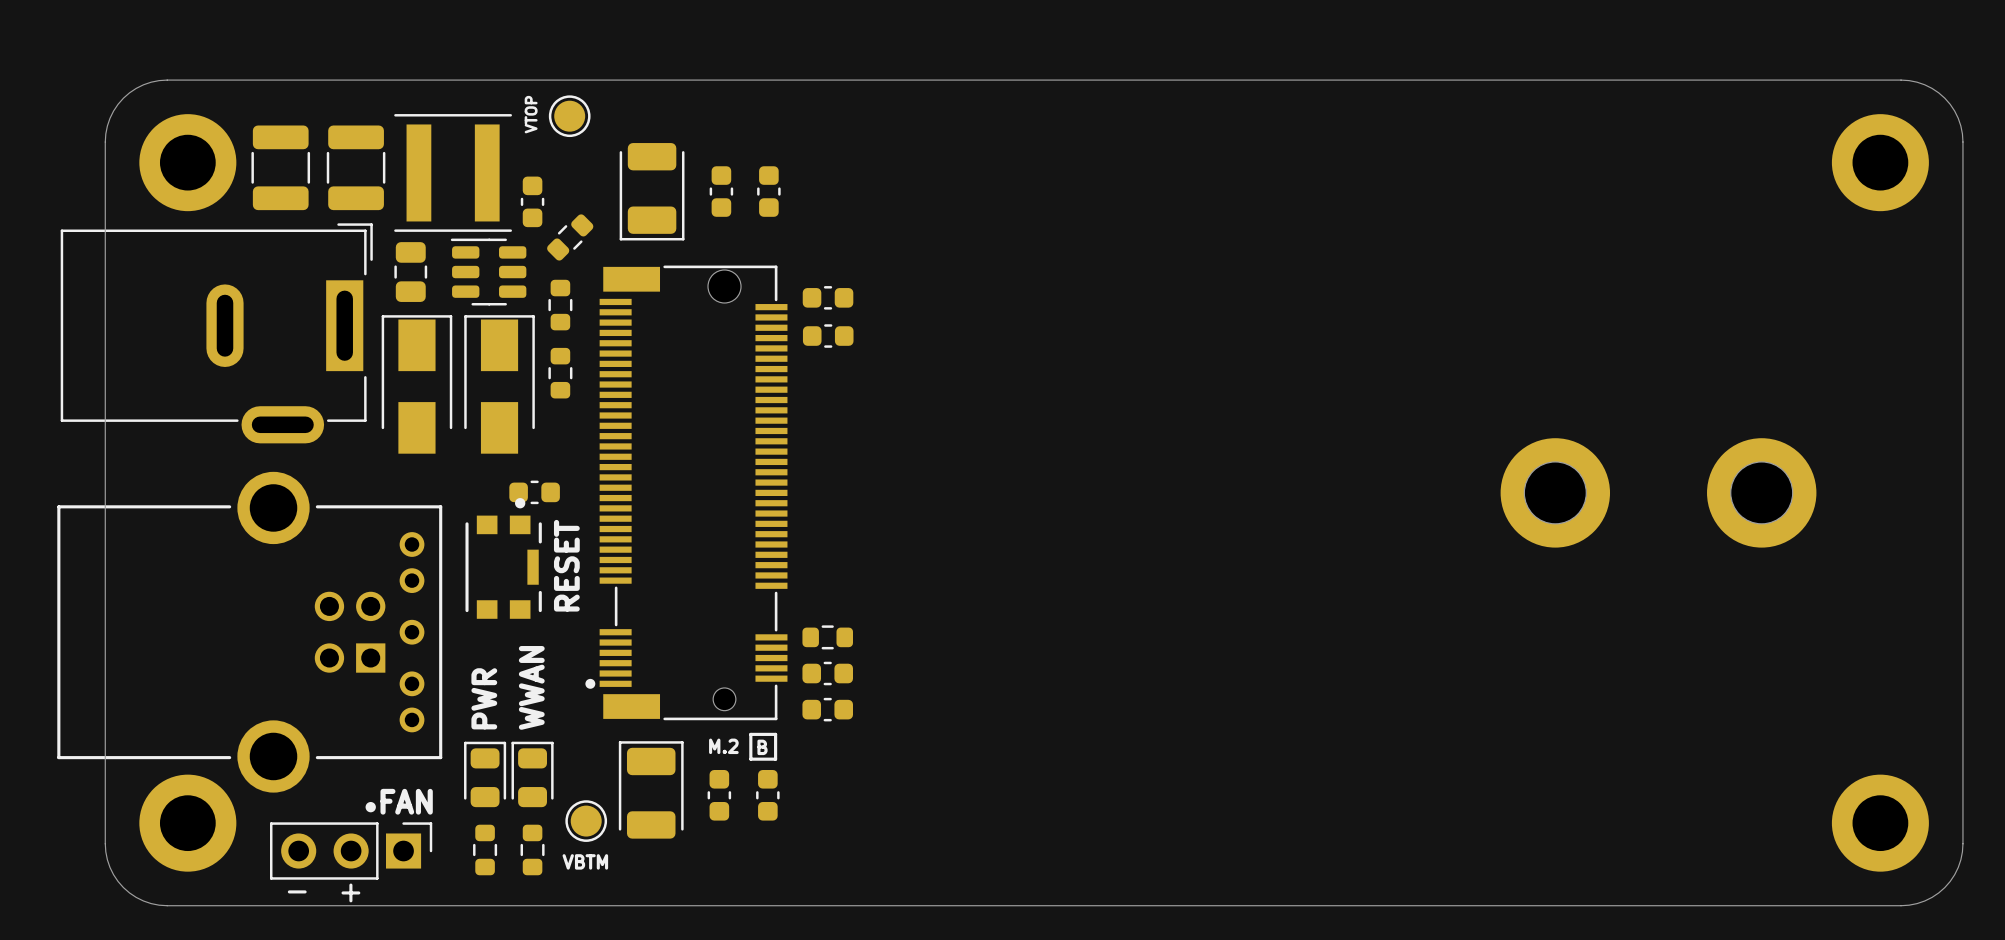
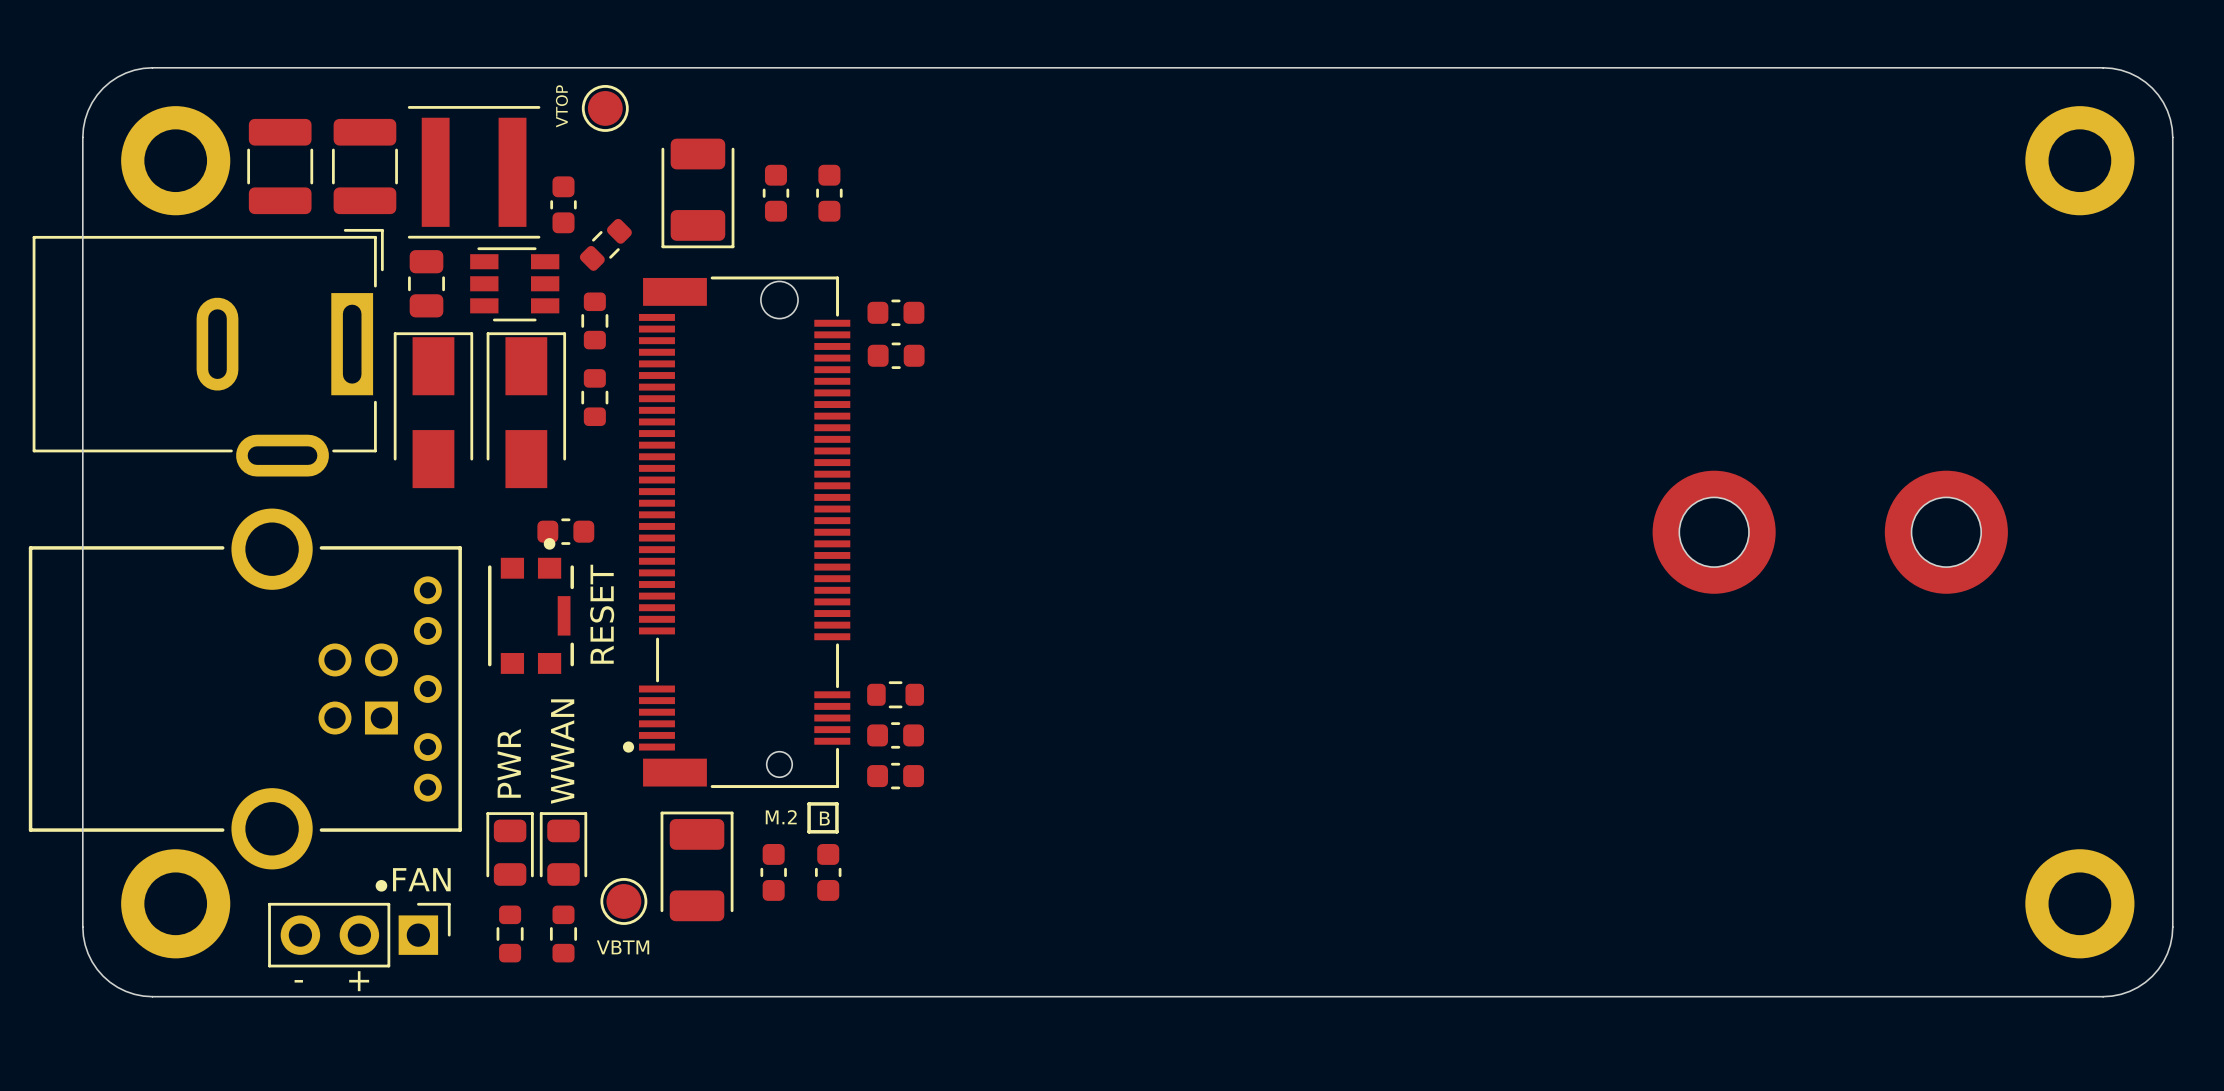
part footprint: [450, 238, 527, 306] -> [470, 247, 560, 322]

